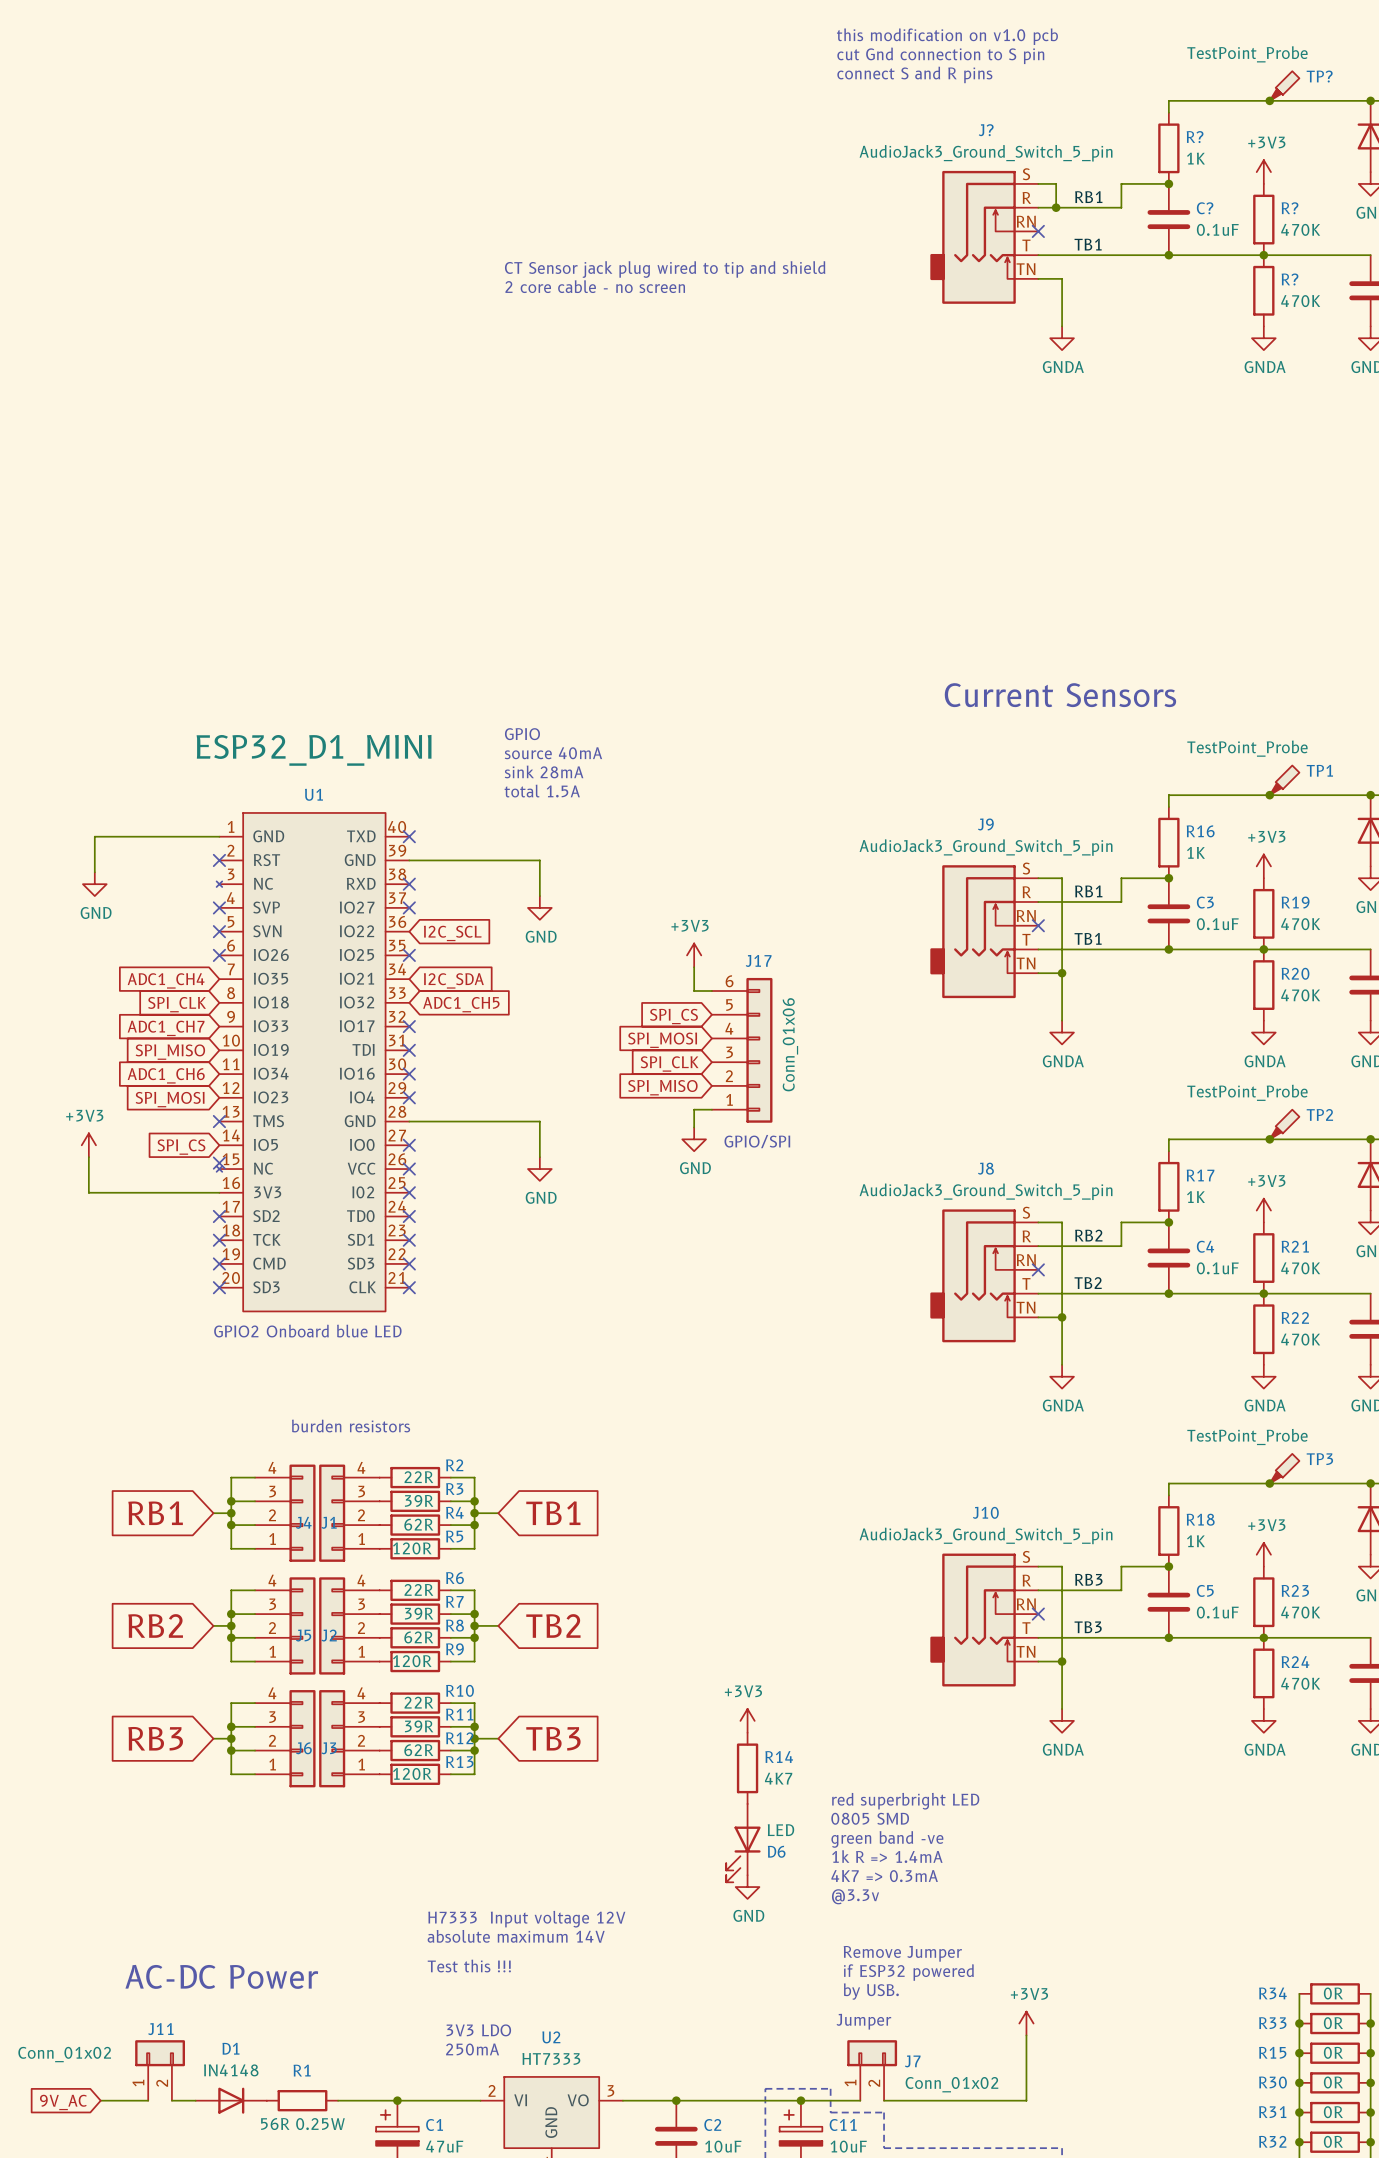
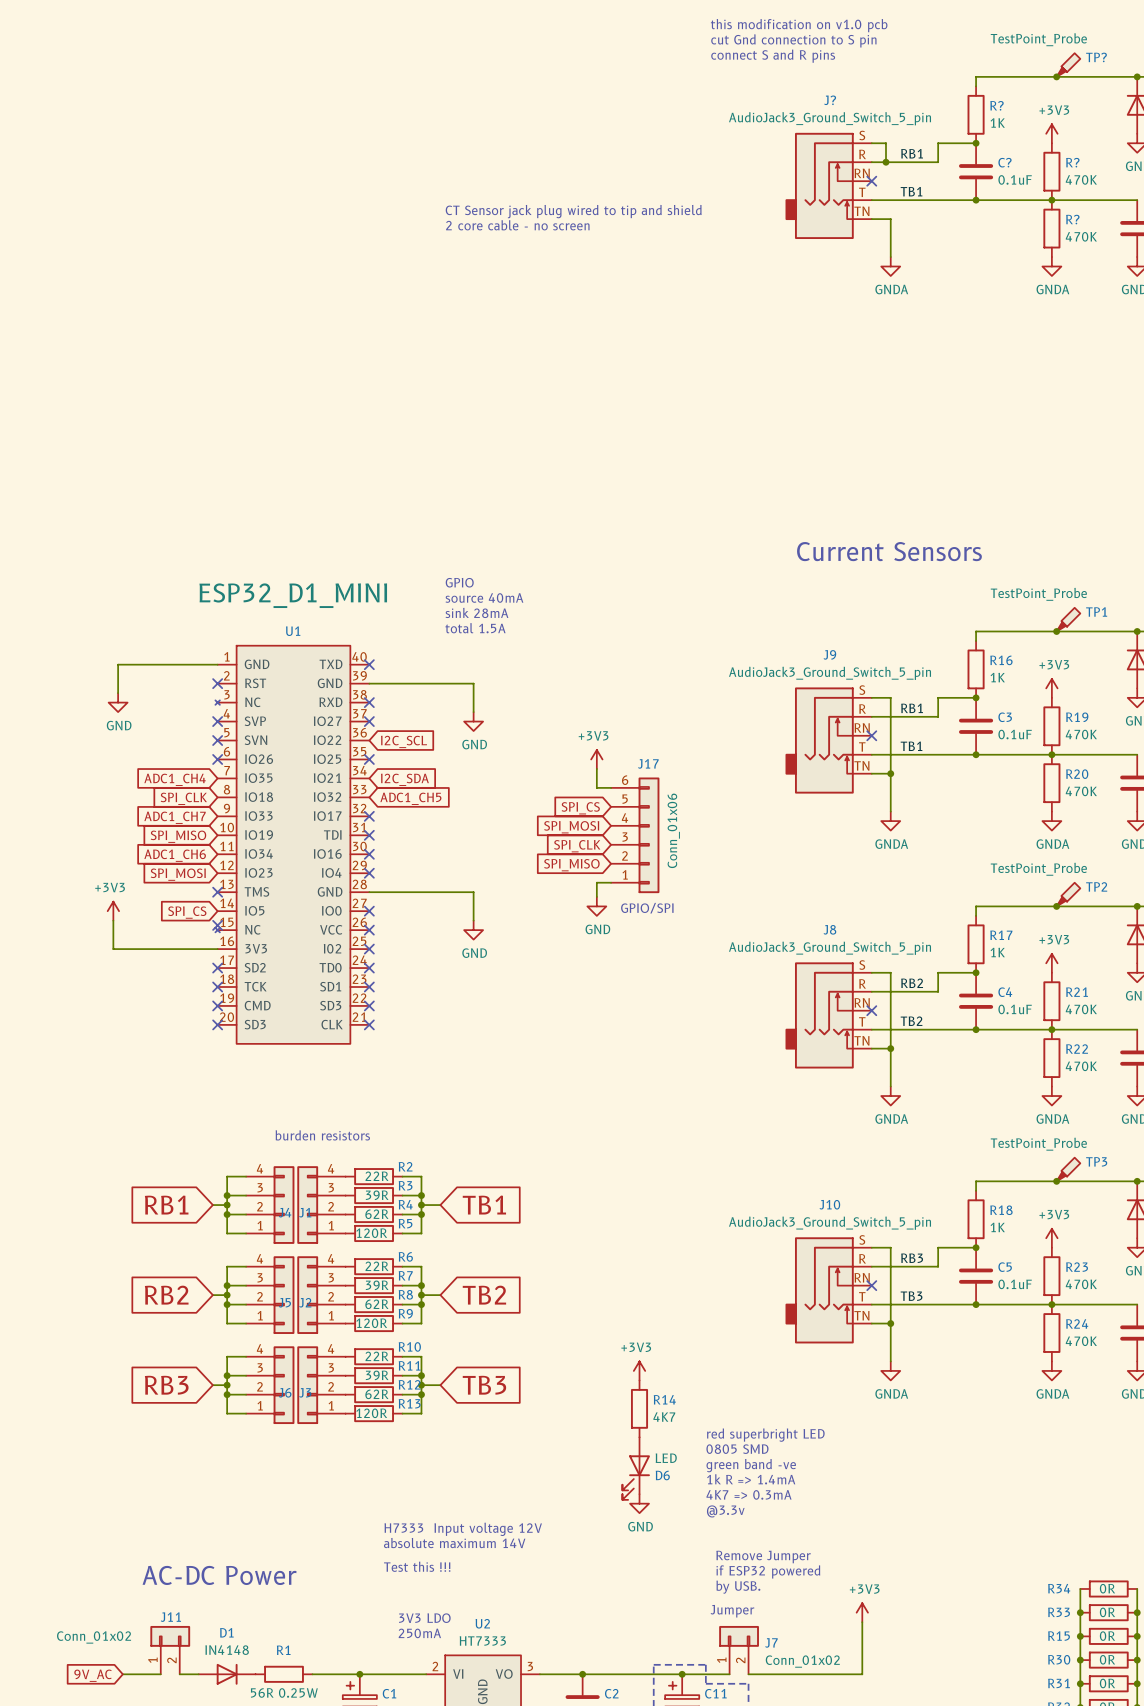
text: GPIO2 Onboard blue LED (307, 1331) -> none

